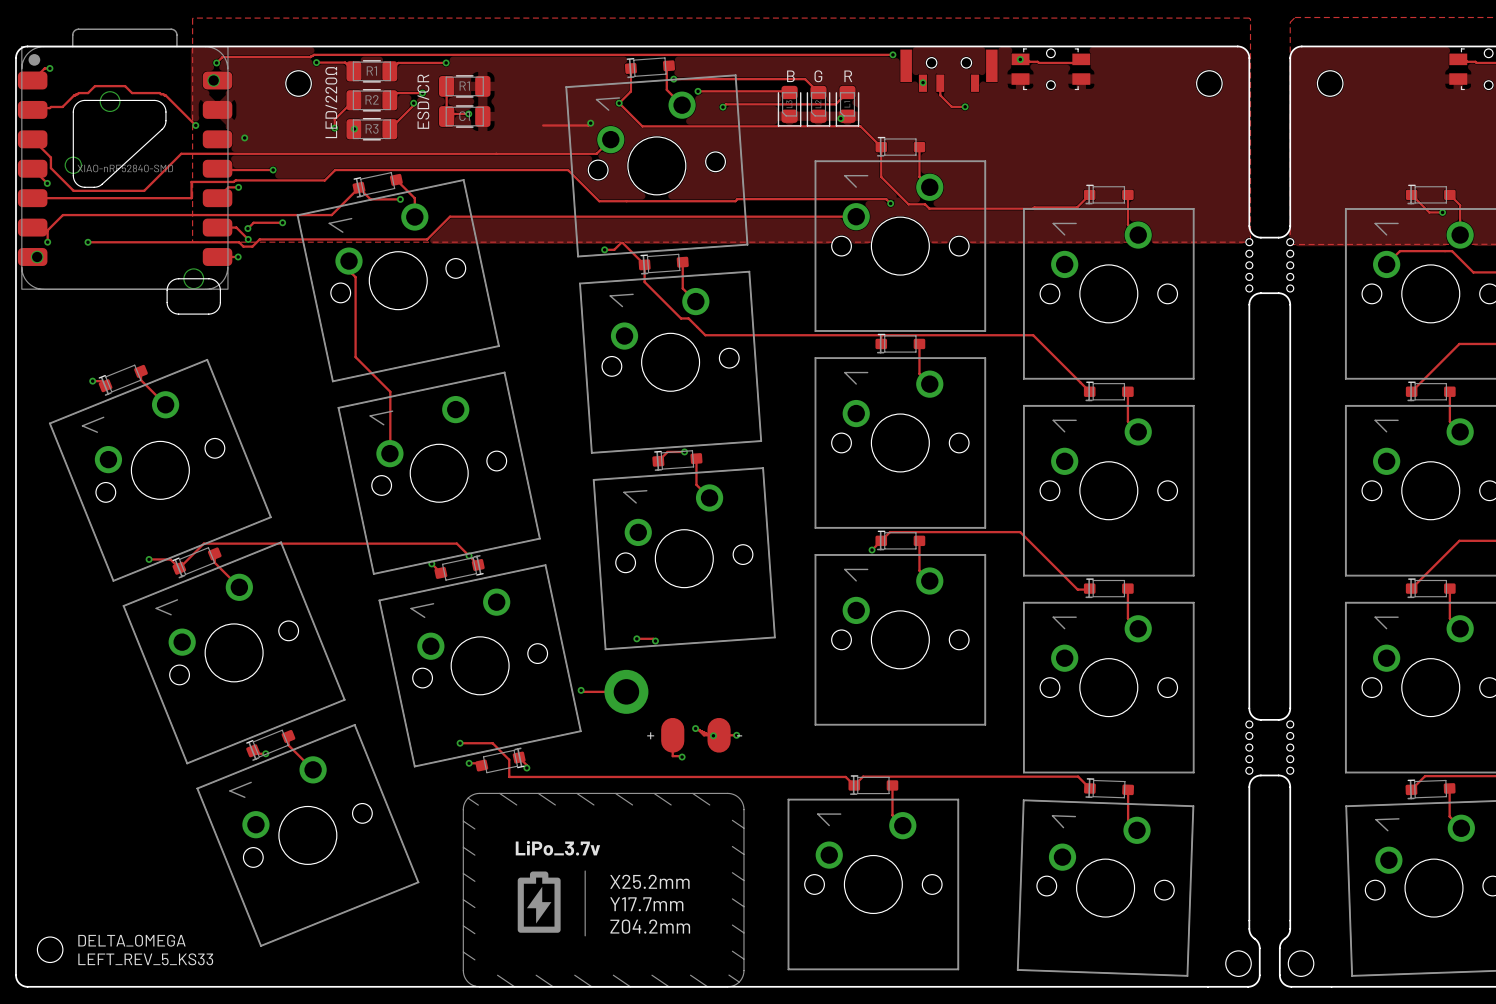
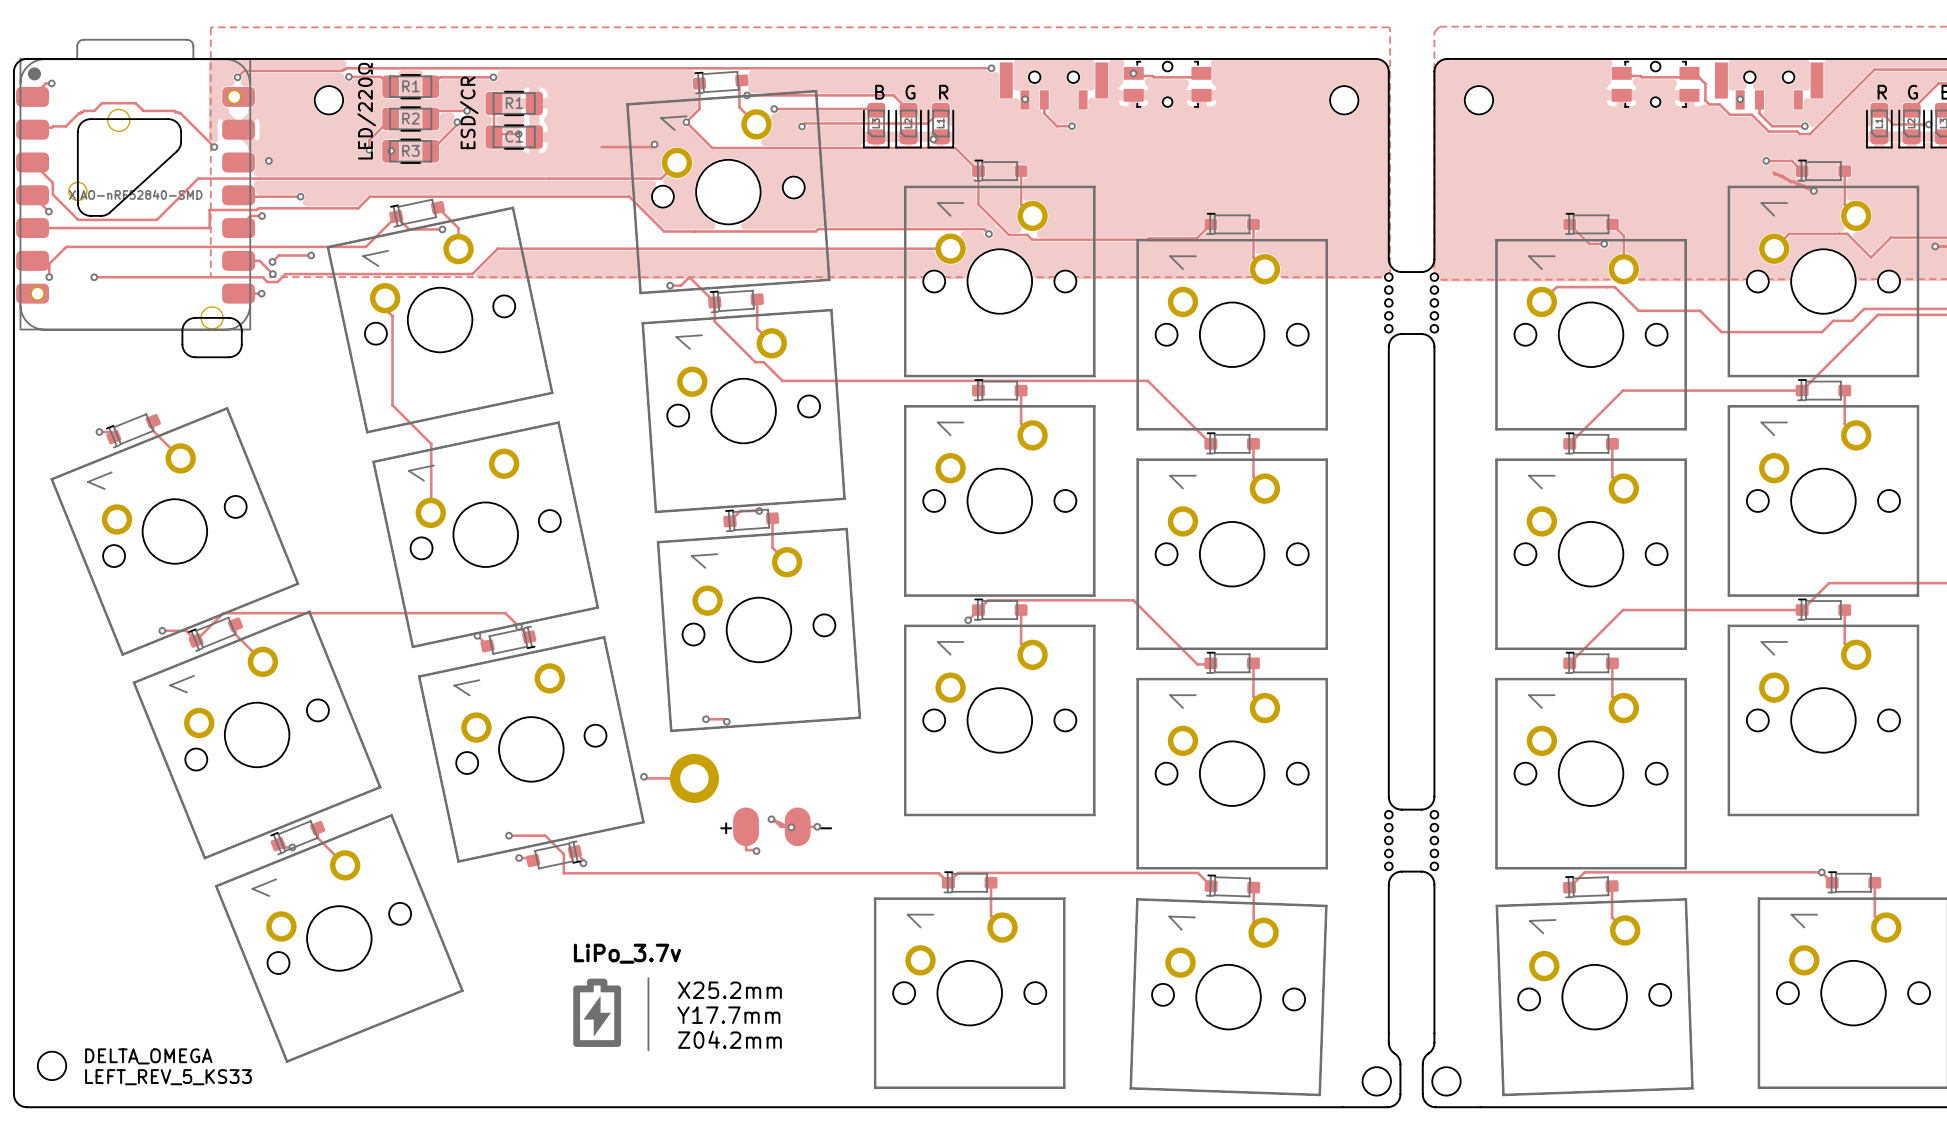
line: (479, 793) (727, 793) (737, 796) (742, 802) (743, 809) (743, 970) (740, 980) (735, 984) (727, 986) (479, 986) (469, 983) (464, 976) (463, 970) (463, 809) (468, 798) (479, 793) -> none
line: (499, 793) (516, 804) -> none
line: (538, 793) (555, 804) -> none
line: (576, 793) (593, 804) -> none
line: (615, 793) (632, 804) -> none
line: (654, 793) (671, 804) -> none
line: (692, 793) (709, 804) -> none
line: (468, 798) (478, 805) -> none
line: (732, 820) (743, 828) -> none
line: (463, 821) (474, 828) -> none
line: (732, 846) (743, 854) -> none
line: (463, 847) (474, 855) -> none
line: (732, 872) (743, 880) -> none
line: (463, 873) (474, 881) -> none
line: (732, 898) (743, 906) -> none
line: (463, 899) (474, 907) -> none
line: (463, 925) (474, 933) -> none
line: (732, 925) (743, 932) -> none
line: (732, 951) (743, 959) -> none
line: (463, 952) (474, 959) -> none
line: (497, 975) (514, 986) -> none
line: (536, 975) (553, 986) -> none
line: (574, 975) (591, 986) -> none
line: (613, 975) (630, 986) -> none
line: (651, 975) (669, 986) -> none
line: (690, 975) (707, 986) -> none
line: (728, 975) (739, 982) -> none

